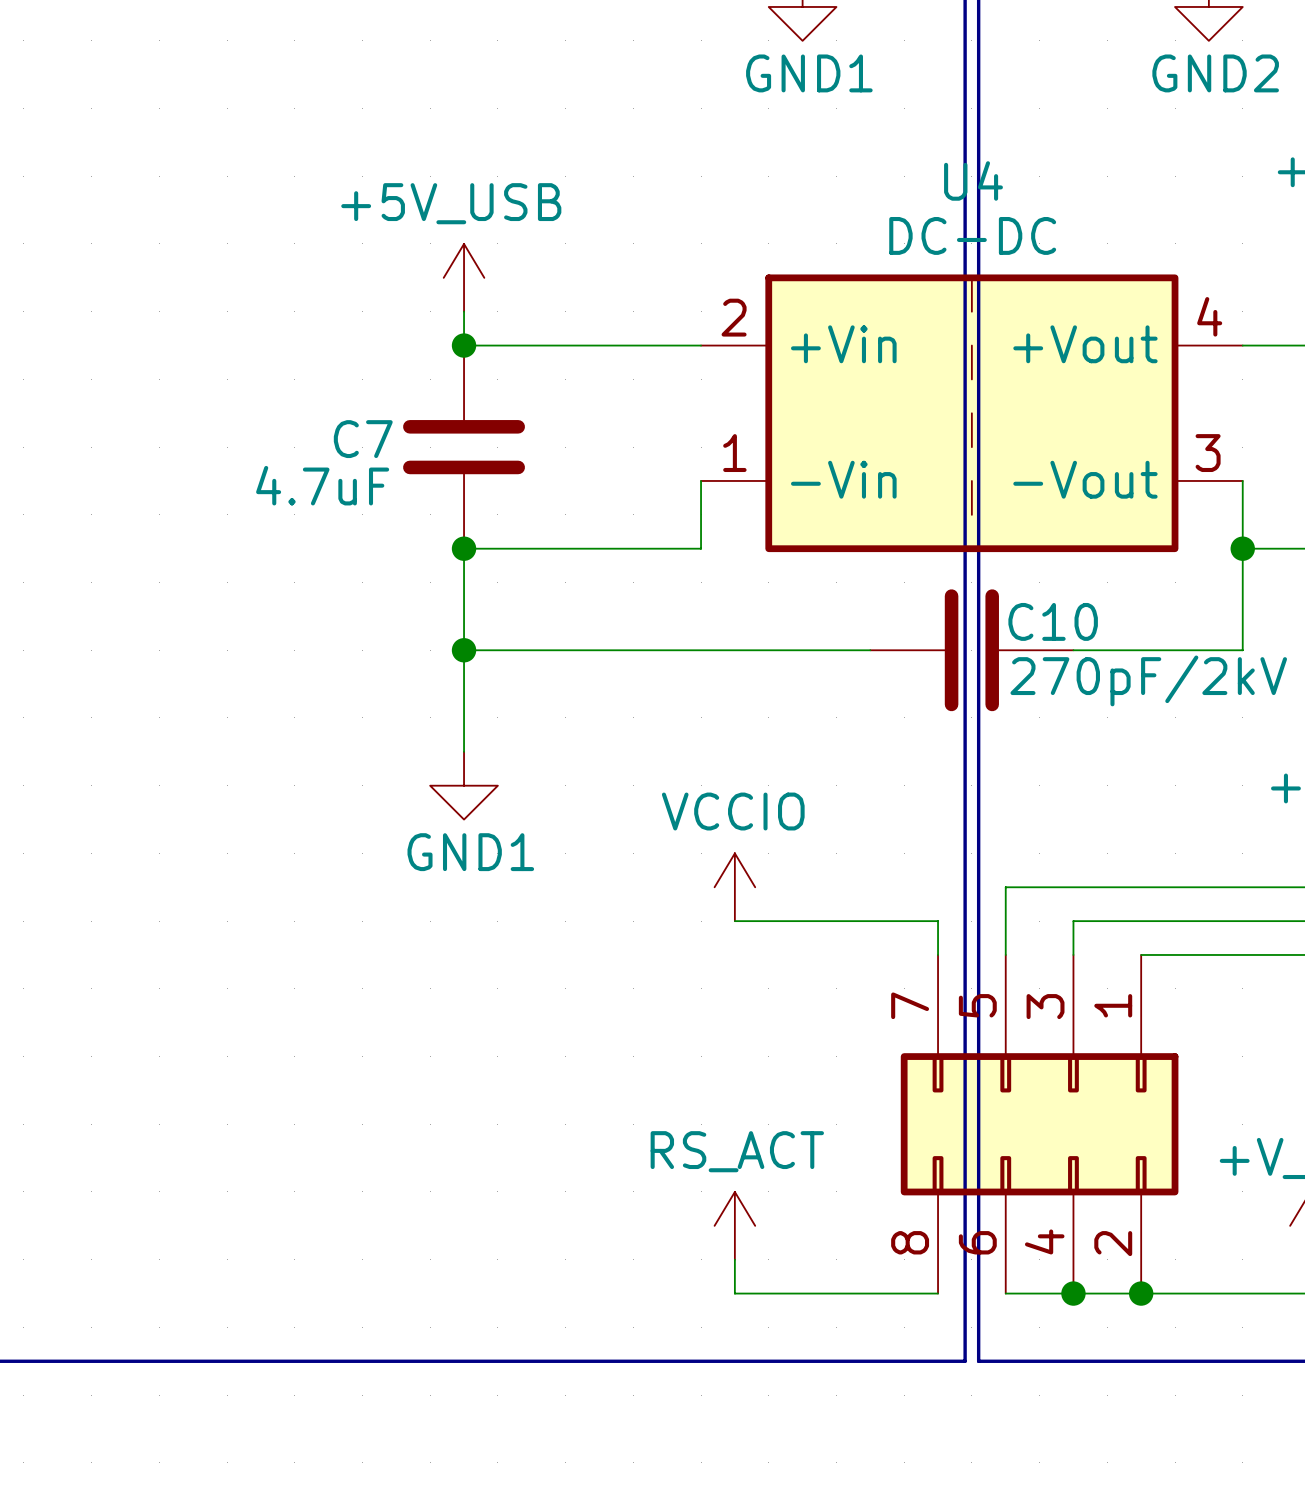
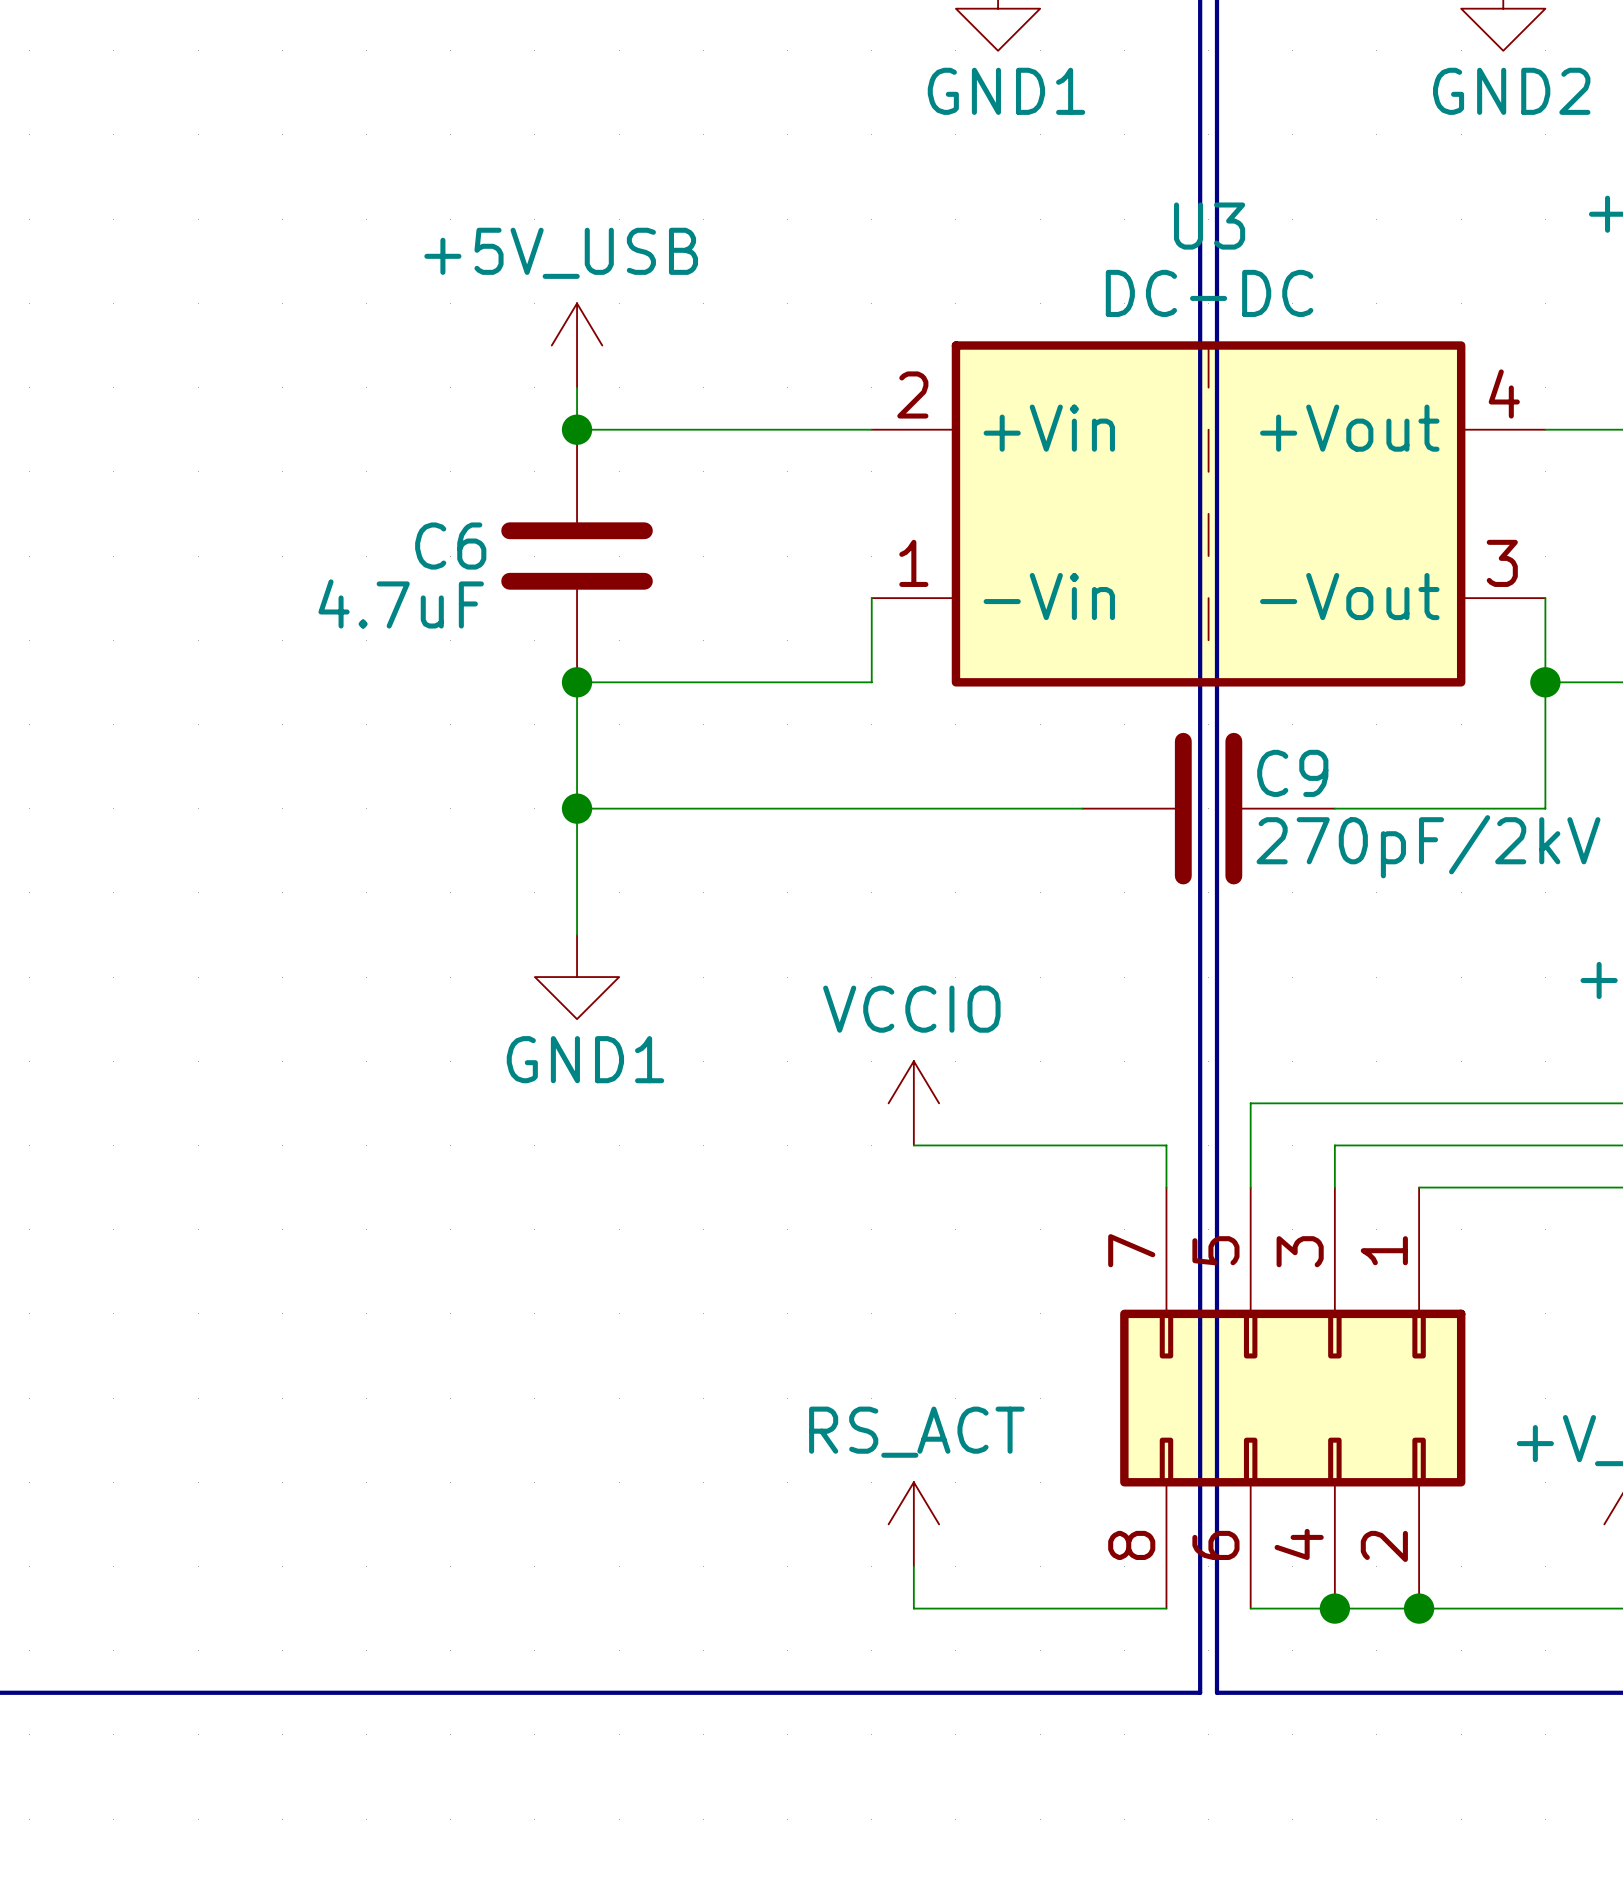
U4 name: U4 (973, 180) -> U3 (1209, 226)
C7 name: C7 (363, 439) -> C6 (450, 546)
C10 name: C10 (1053, 621) -> C9 (1292, 773)

